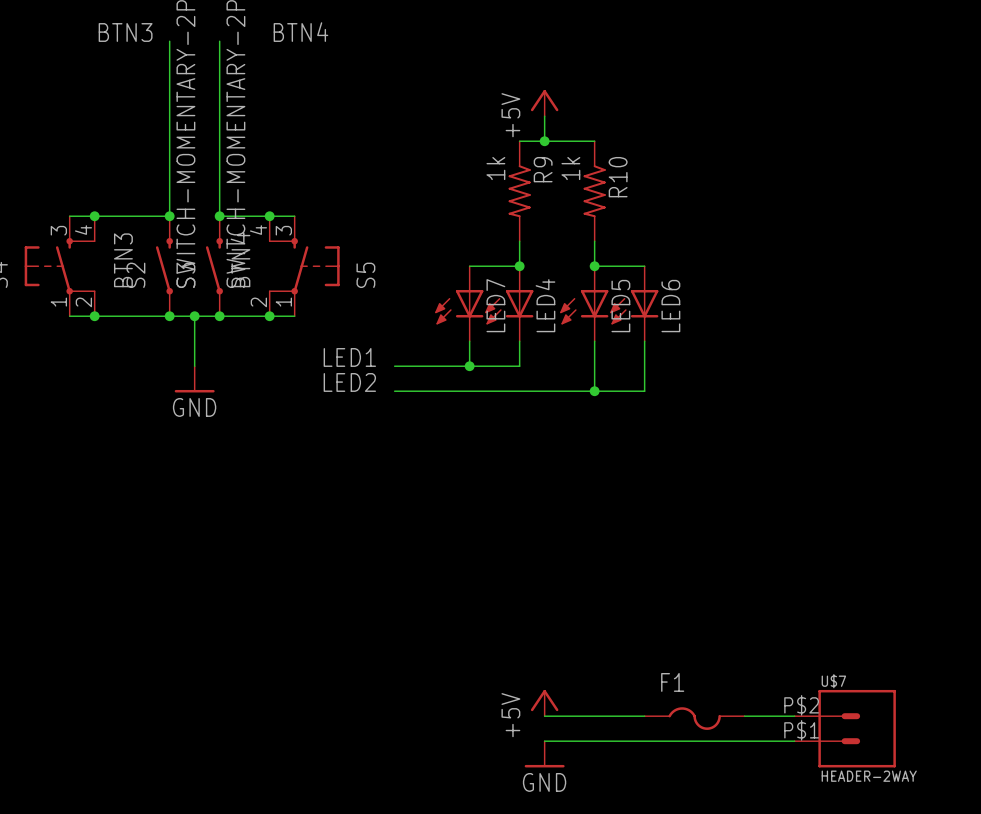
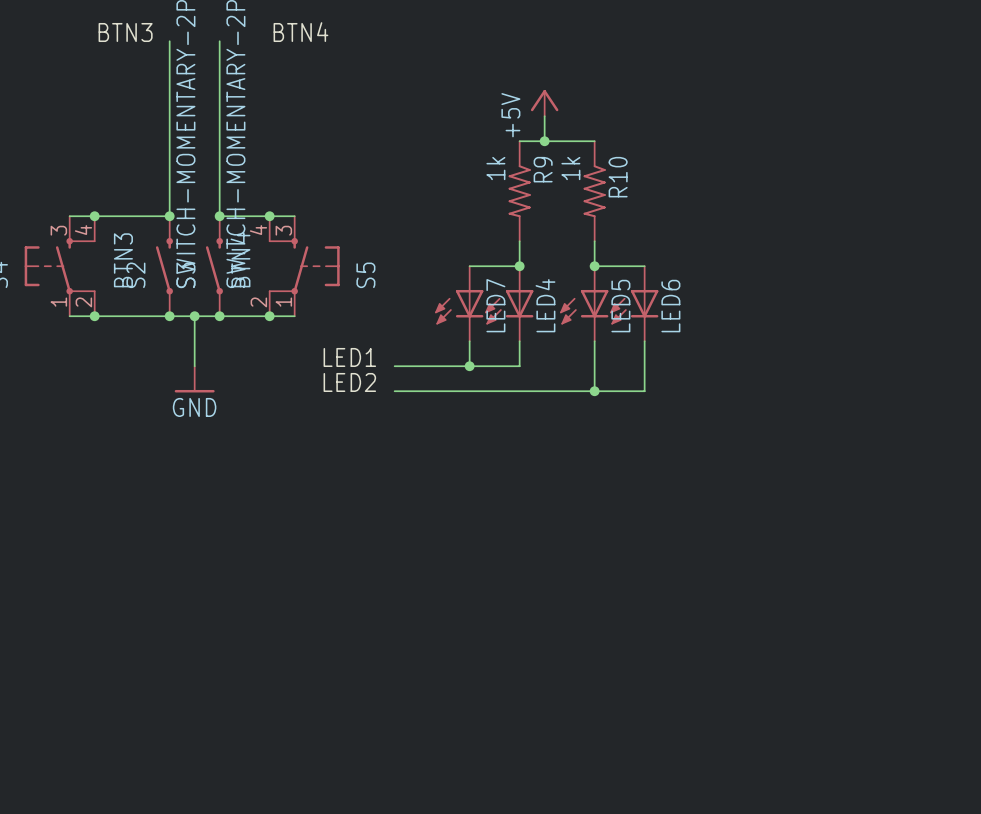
power symbol: +5V (544, 703) -> none
wire: (544, 716) (644, 716) -> none
wire: (744, 716) (794, 716) -> none
F1: (694, 718) -> none
U$7: HEADER-2WAY (845, 728) -> none
wire: (544, 741) (794, 741) -> none
power symbol: GND (544, 754) -> none

